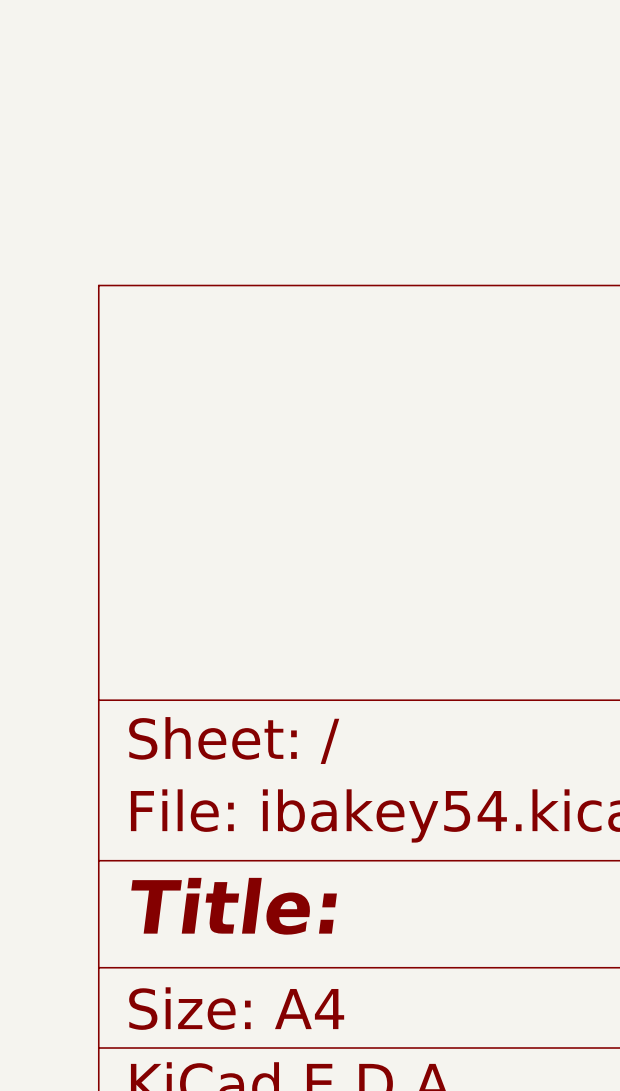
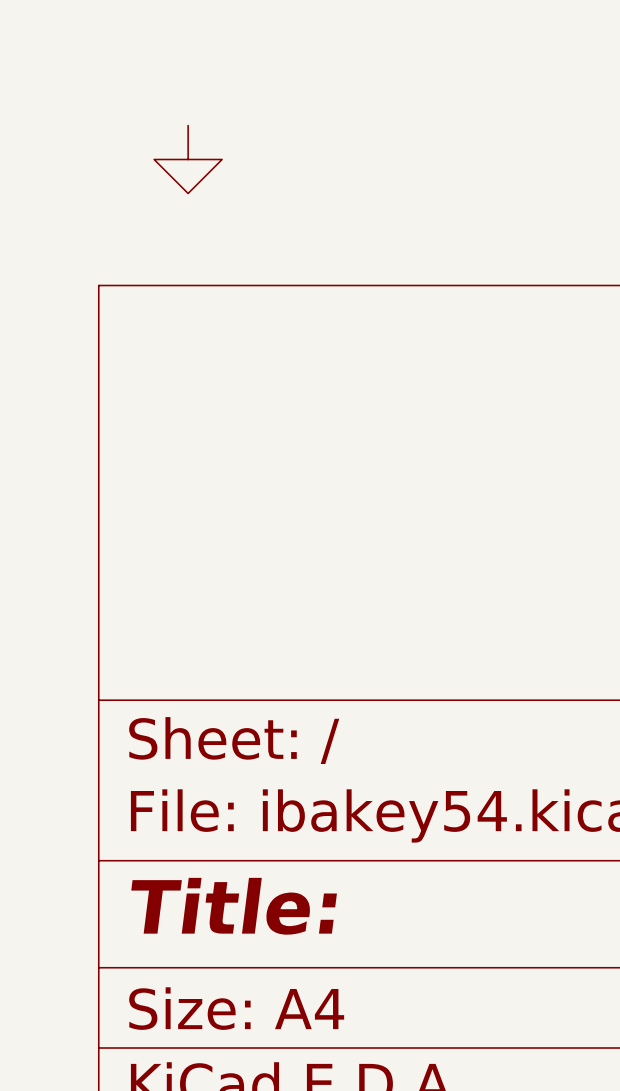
power symbol: none -> (188, 159)

